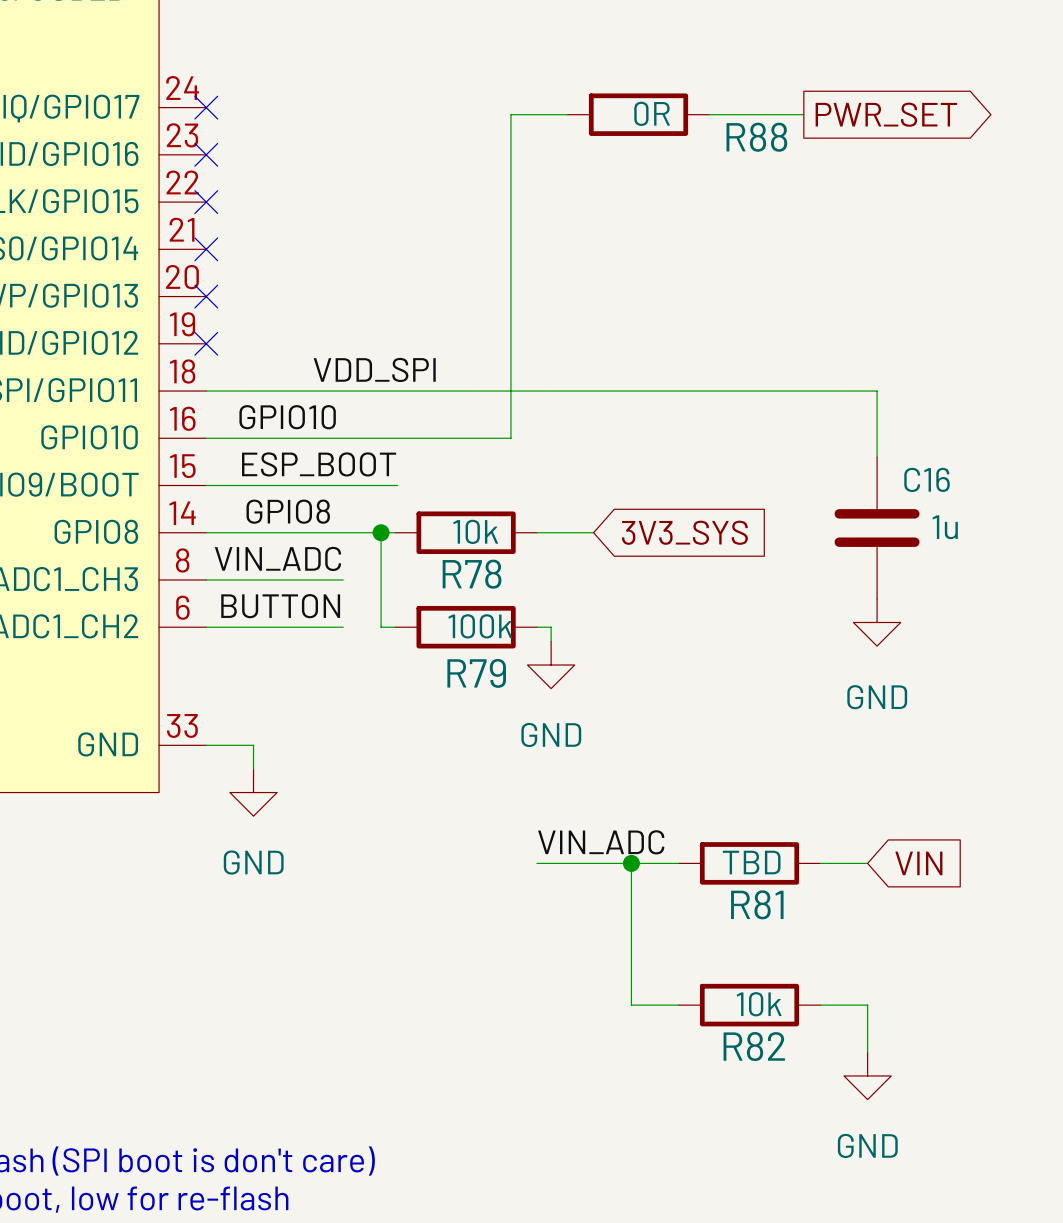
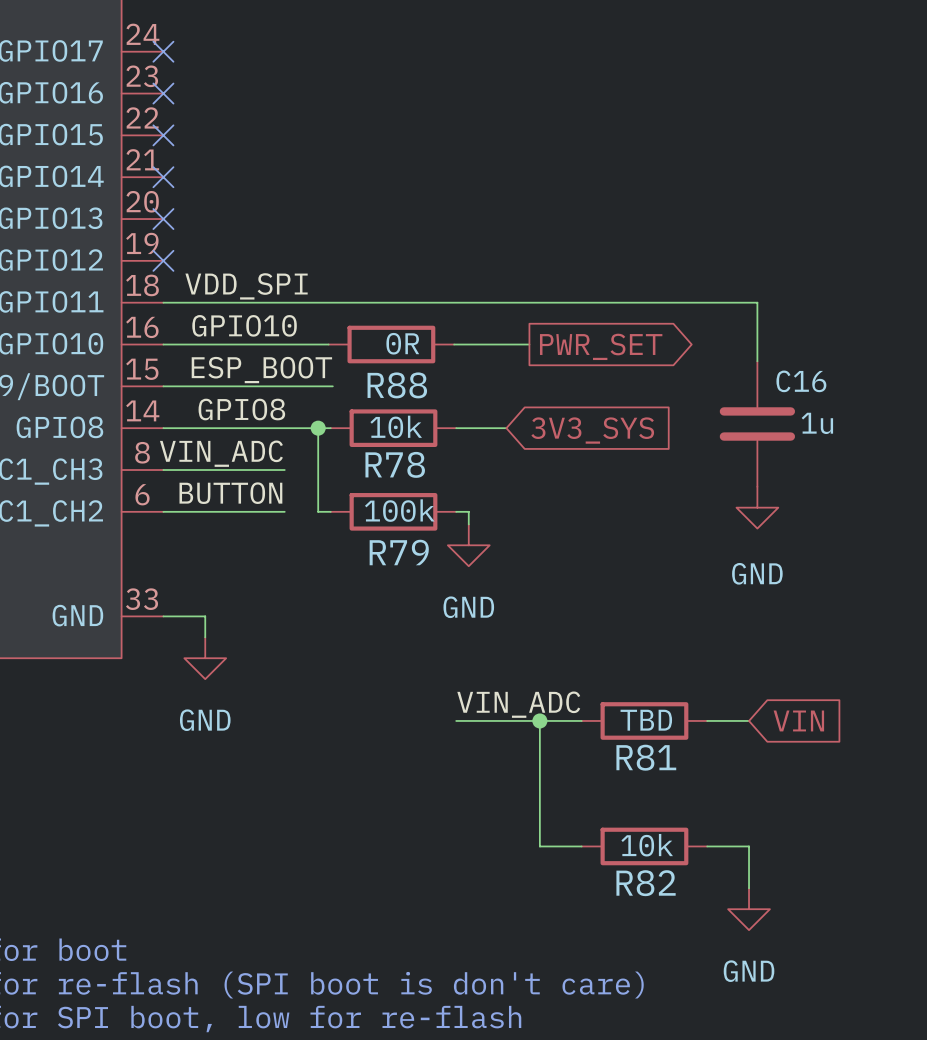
wire: (567, 114) (510, 114) (510, 438) (392, 438) -> none
R88 position: (638, 114) -> (391, 344)
wire: (709, 114) (803, 114) -> none
global label position: PWR_SET (886, 114) -> PWR_SET (601, 346)
R88 name position: R88 (756, 137) -> R88 (397, 385)
label position: VDD_SPI (374, 369) -> VDD_SPI (246, 286)
wire: none -> (454, 344) (529, 344)

